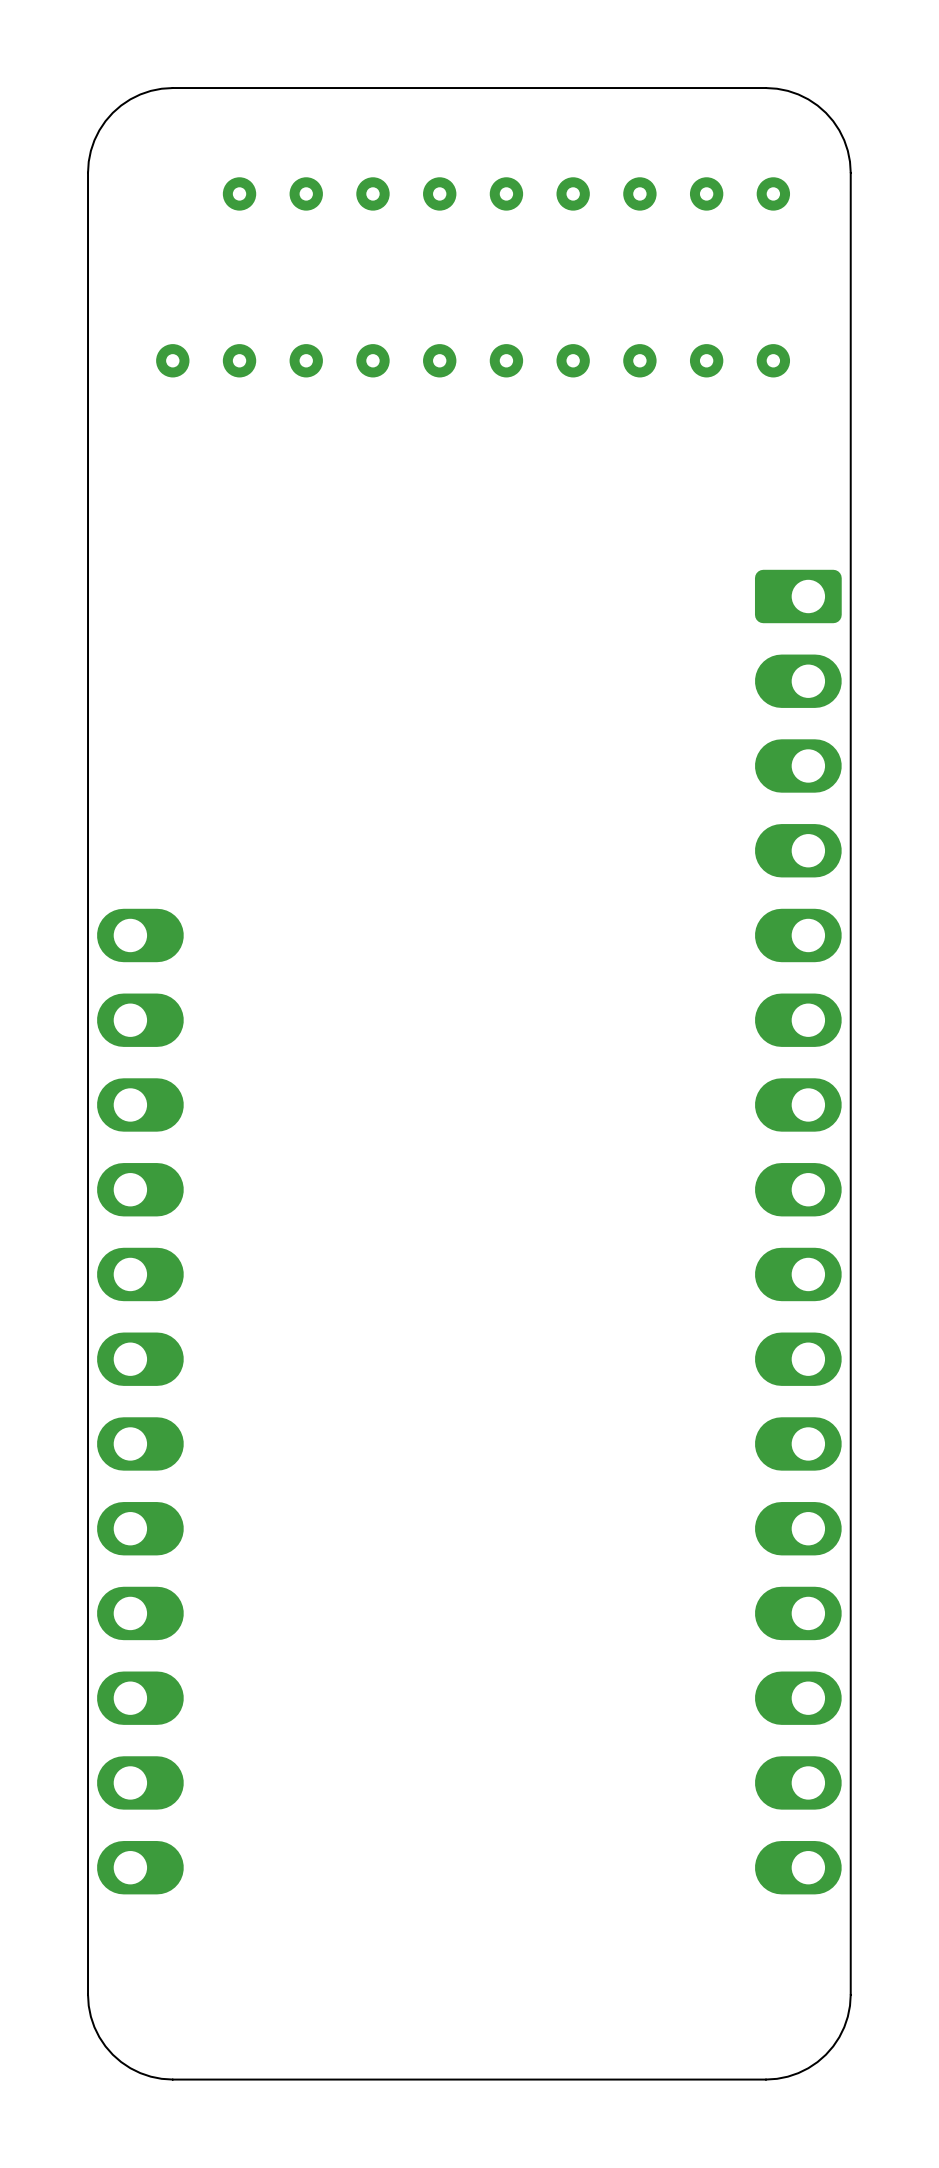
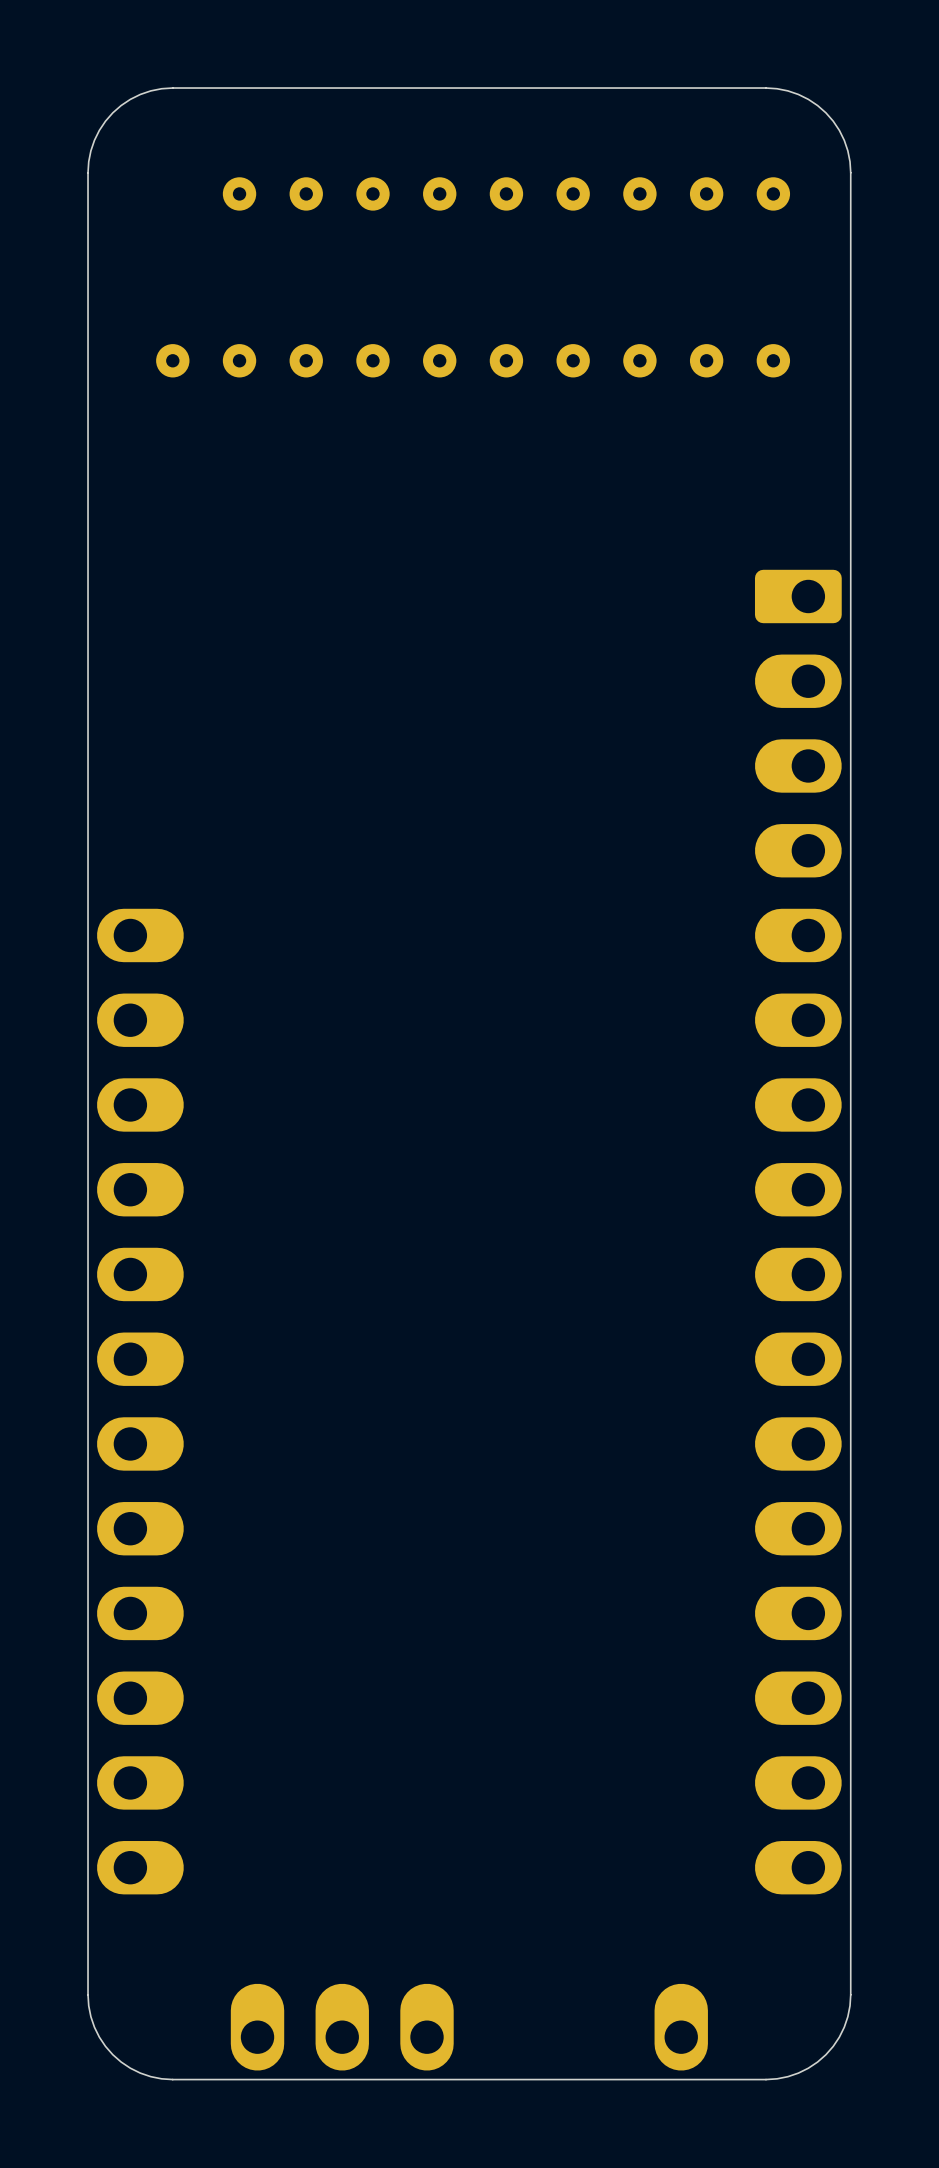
part footprint: [87, 87, 852, 2081] -> [87, 87, 852, 2081]

